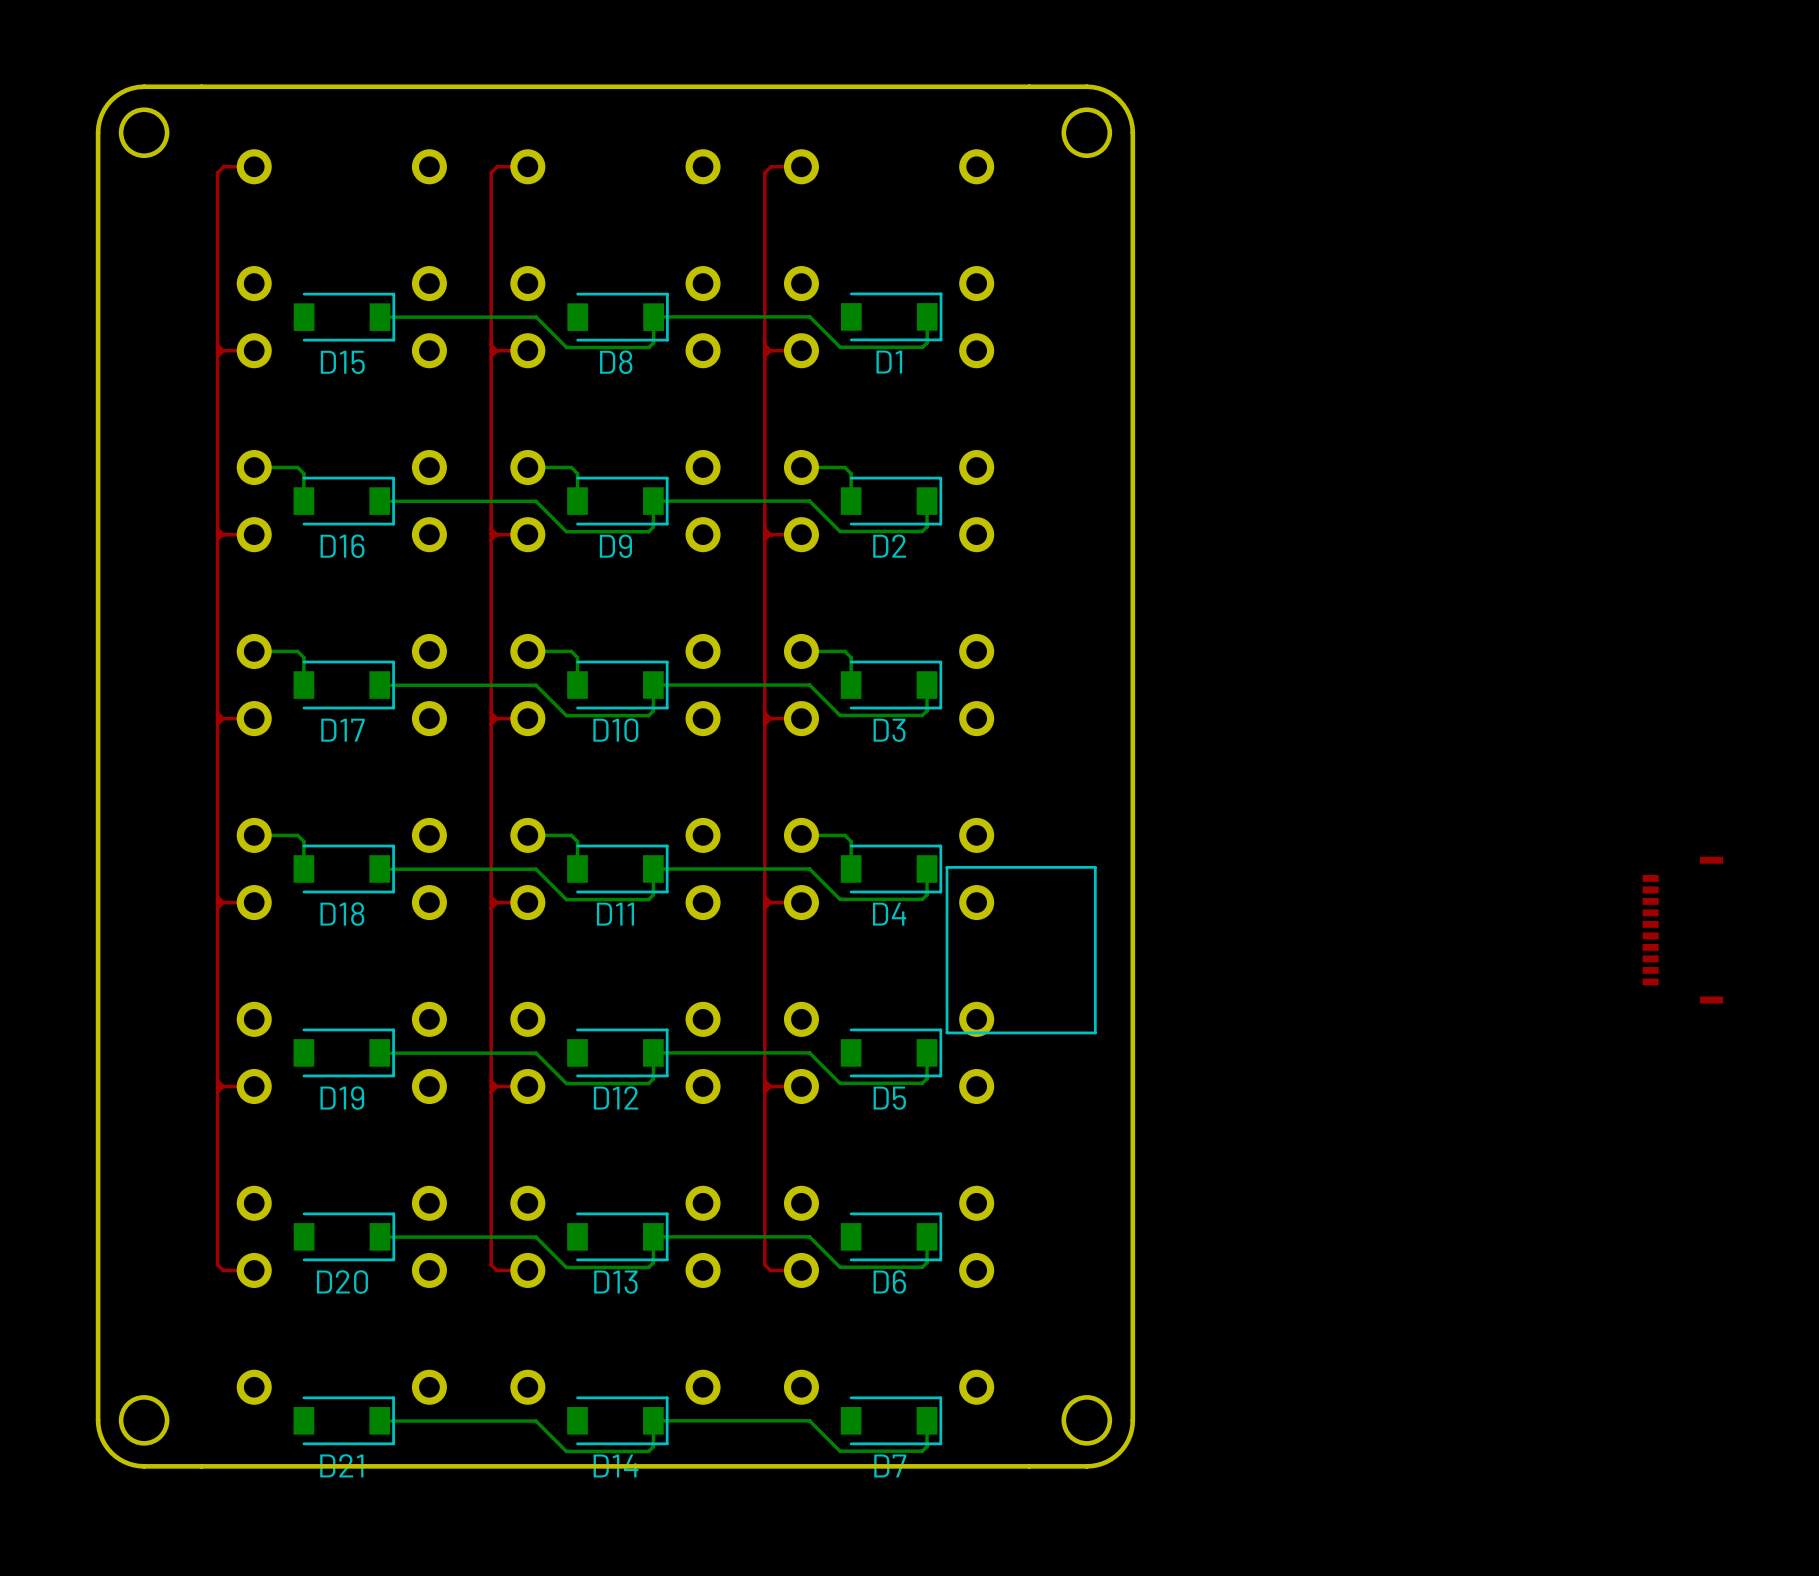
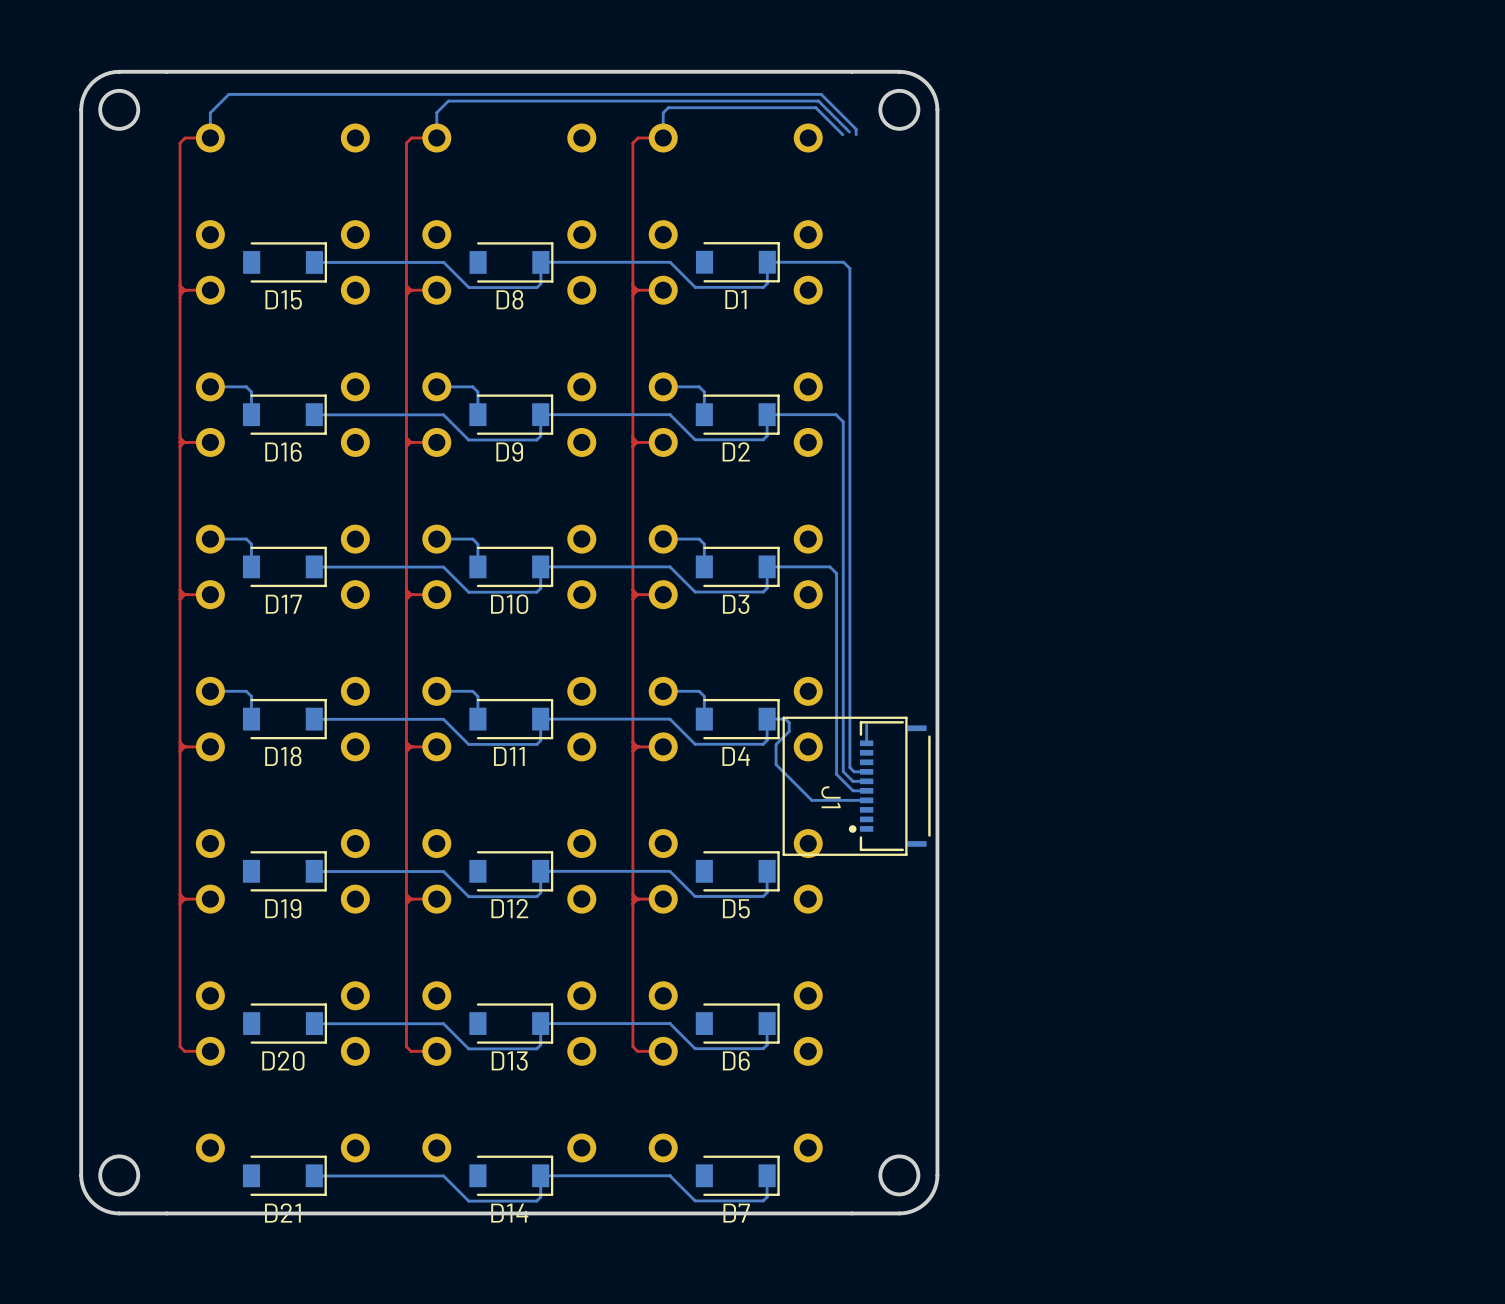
bottom track: none -> (849, 132) (818, 101) (448, 101) (436, 112) (436, 138)
bottom track: none -> (842, 134) (815, 107) (668, 107) (663, 112) (663, 138)
bottom track: none -> (856, 134) (856, 129) (821, 94) (228, 94) (210, 112) (210, 138)
bottom track: none -> (767, 262) (843, 262) (849, 268) (849, 767) (854, 771) (866, 771)
bottom track: none -> (767, 414) (836, 414) (843, 421) (843, 771) (852, 781) (866, 781)
bottom track: none -> (767, 566) (829, 566) (836, 573) (836, 774) (853, 790) (866, 790)
bottom track: none -> (767, 719) (785, 719) (789, 722) (789, 731) (776, 744) (776, 764) (811, 800) (866, 800)
bottom track: none -> (866, 724) (866, 743)
part: (1682, 930) -> none
J1: none -> (889, 786)

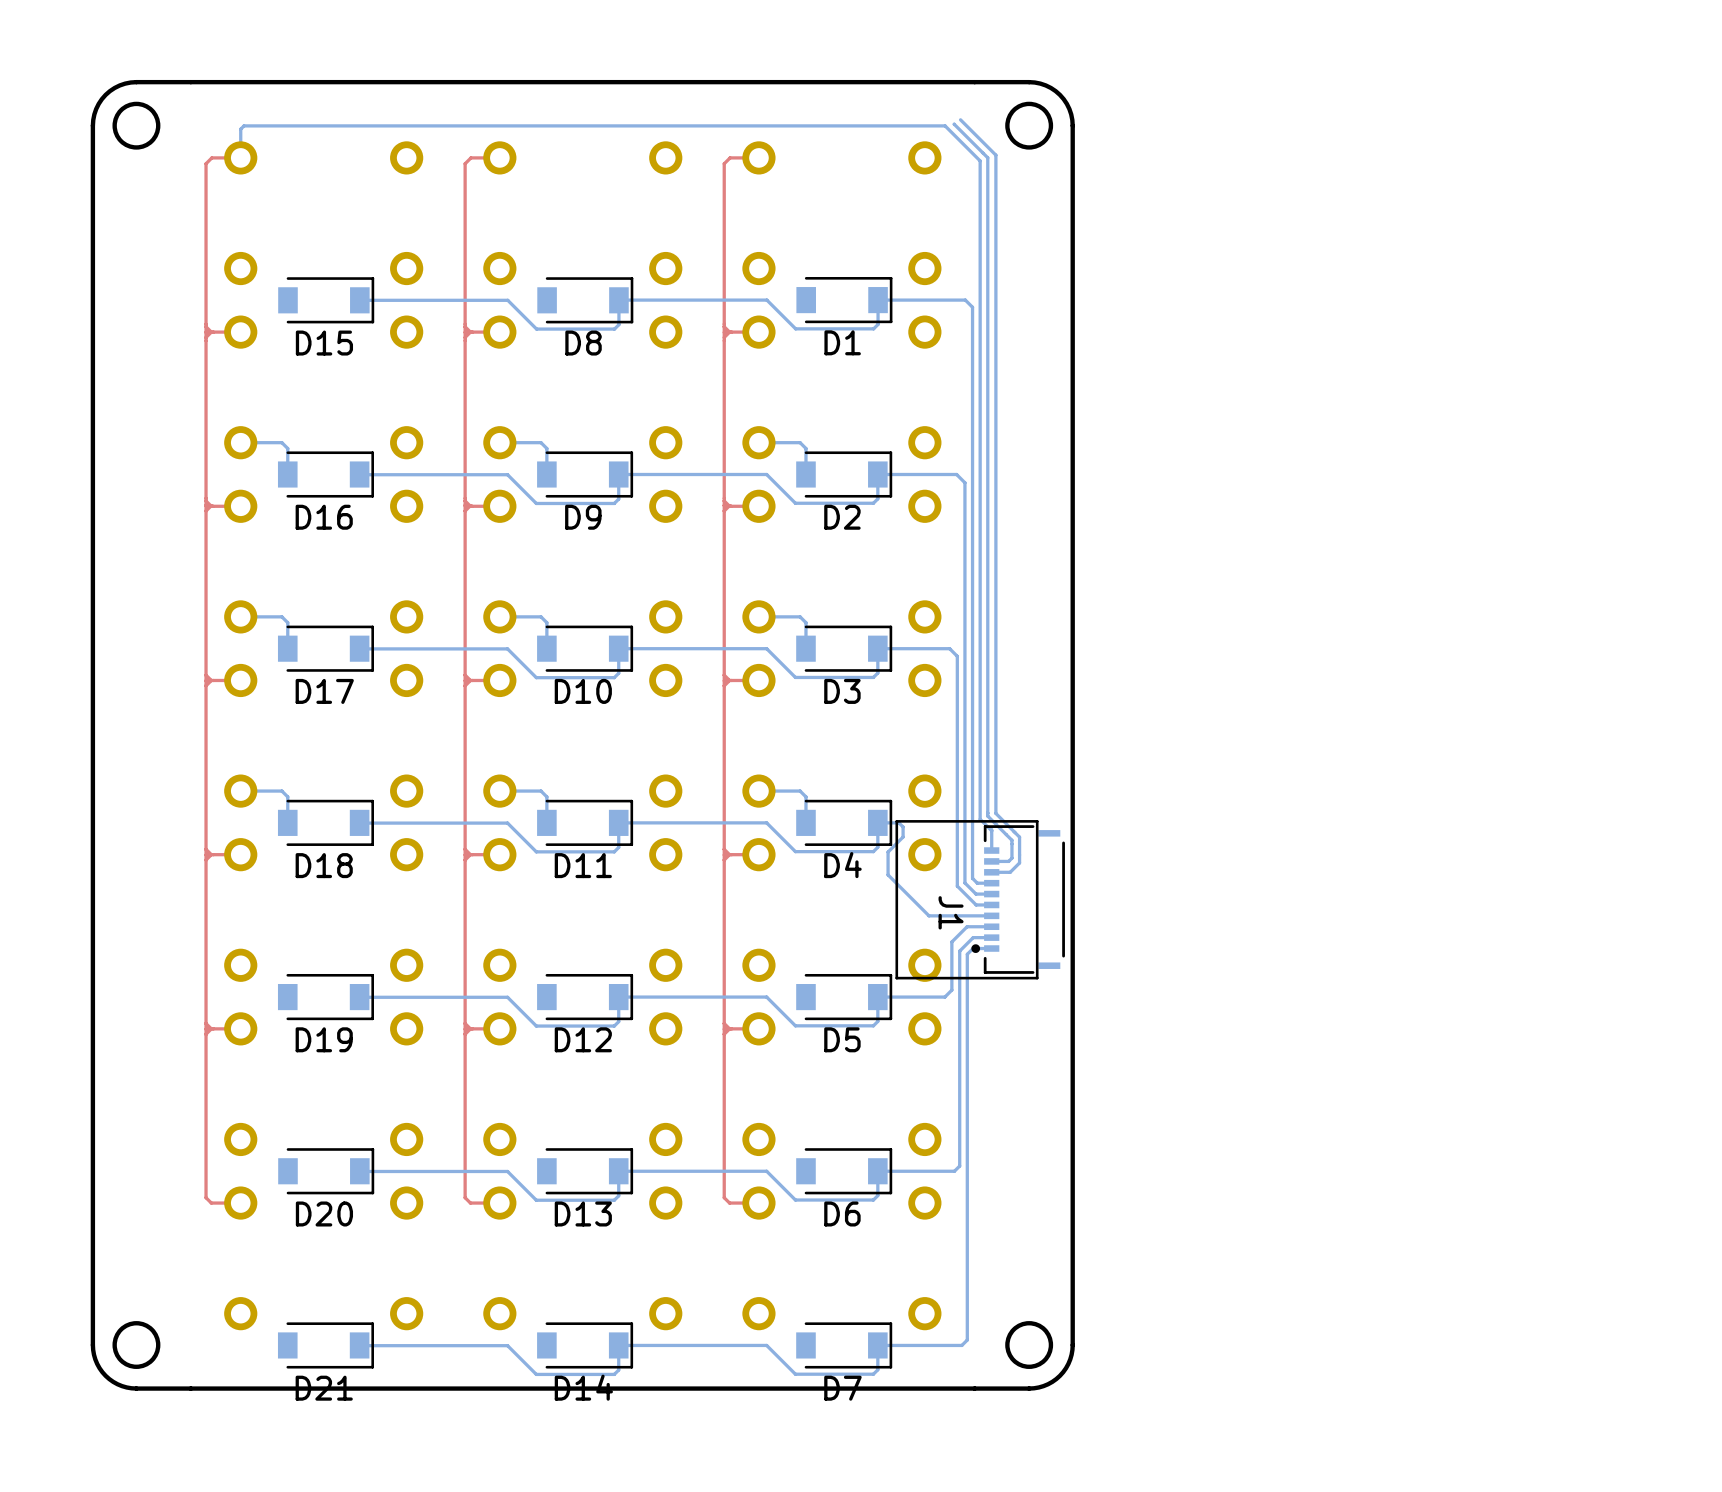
bottom track: none -> (960, 119) (995, 155) (995, 813) (1019, 837) (1019, 862) (1010, 872) (991, 872)
bottom track: none -> (954, 124) (987, 157) (987, 816) (1011, 840) (1011, 858) (1008, 861) (991, 861)
bottom track: (213, 110) (228, 94) (821, 94) (856, 129) (856, 134) -> (244, 125) (945, 125) (980, 160) (980, 819) (991, 830)
bottom track: (849, 132) (818, 101) (448, 101) (436, 112) (436, 138) -> none
bottom track: (842, 134) (815, 107) (668, 107) (663, 112) (663, 138) -> none
bottom track: none -> (991, 926) (967, 926) (951, 941) (951, 990) (944, 997) (877, 997)
bottom track: none -> (991, 937) (973, 937) (959, 951) (959, 1166) (954, 1171) (877, 1171)
bottom track: none -> (991, 948) (973, 948) (967, 954) (967, 1340) (961, 1345) (877, 1345)

